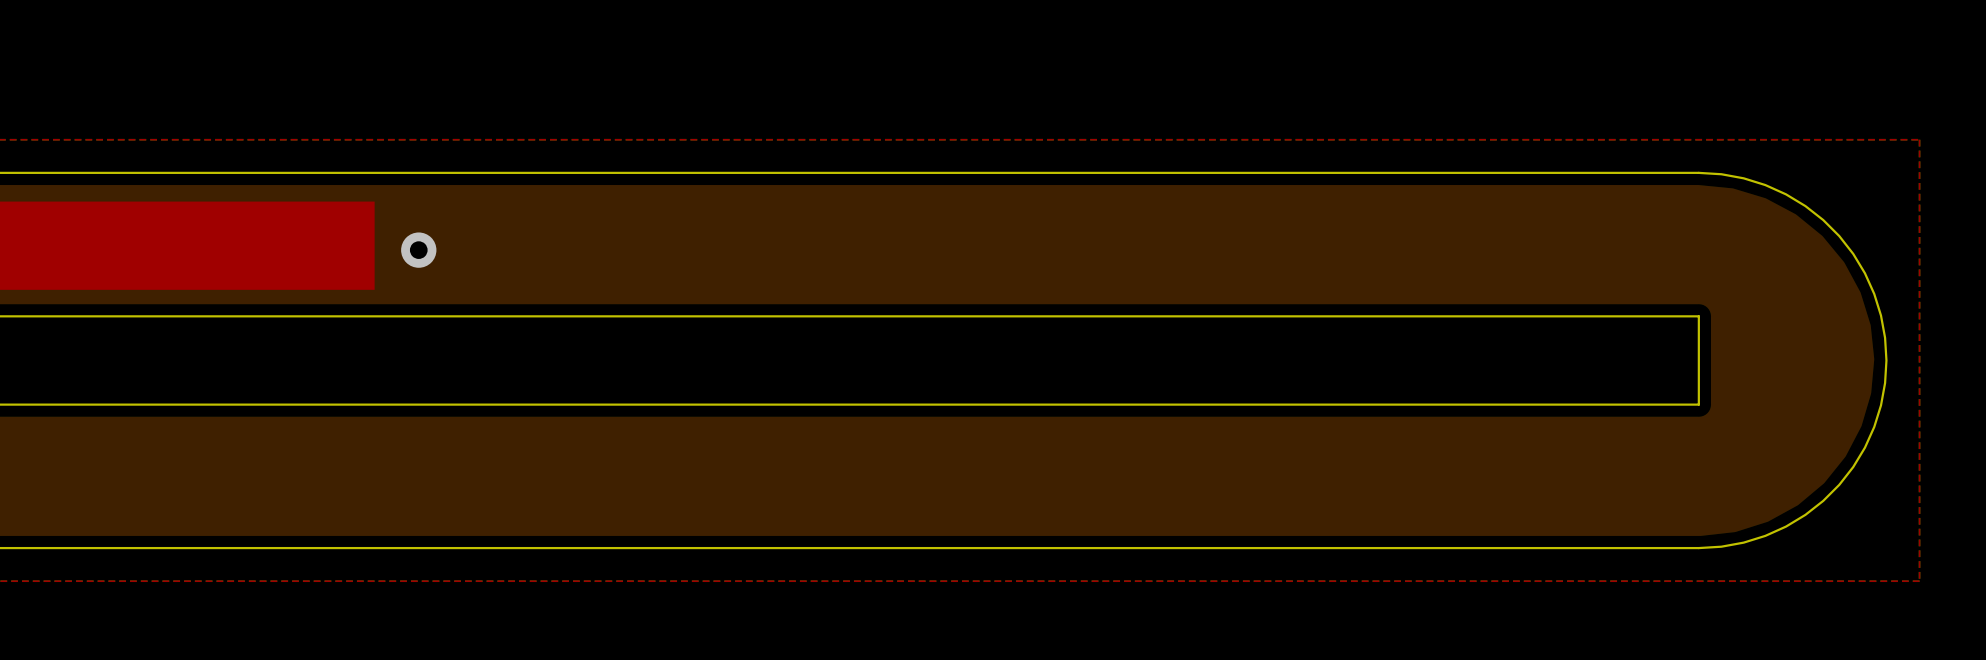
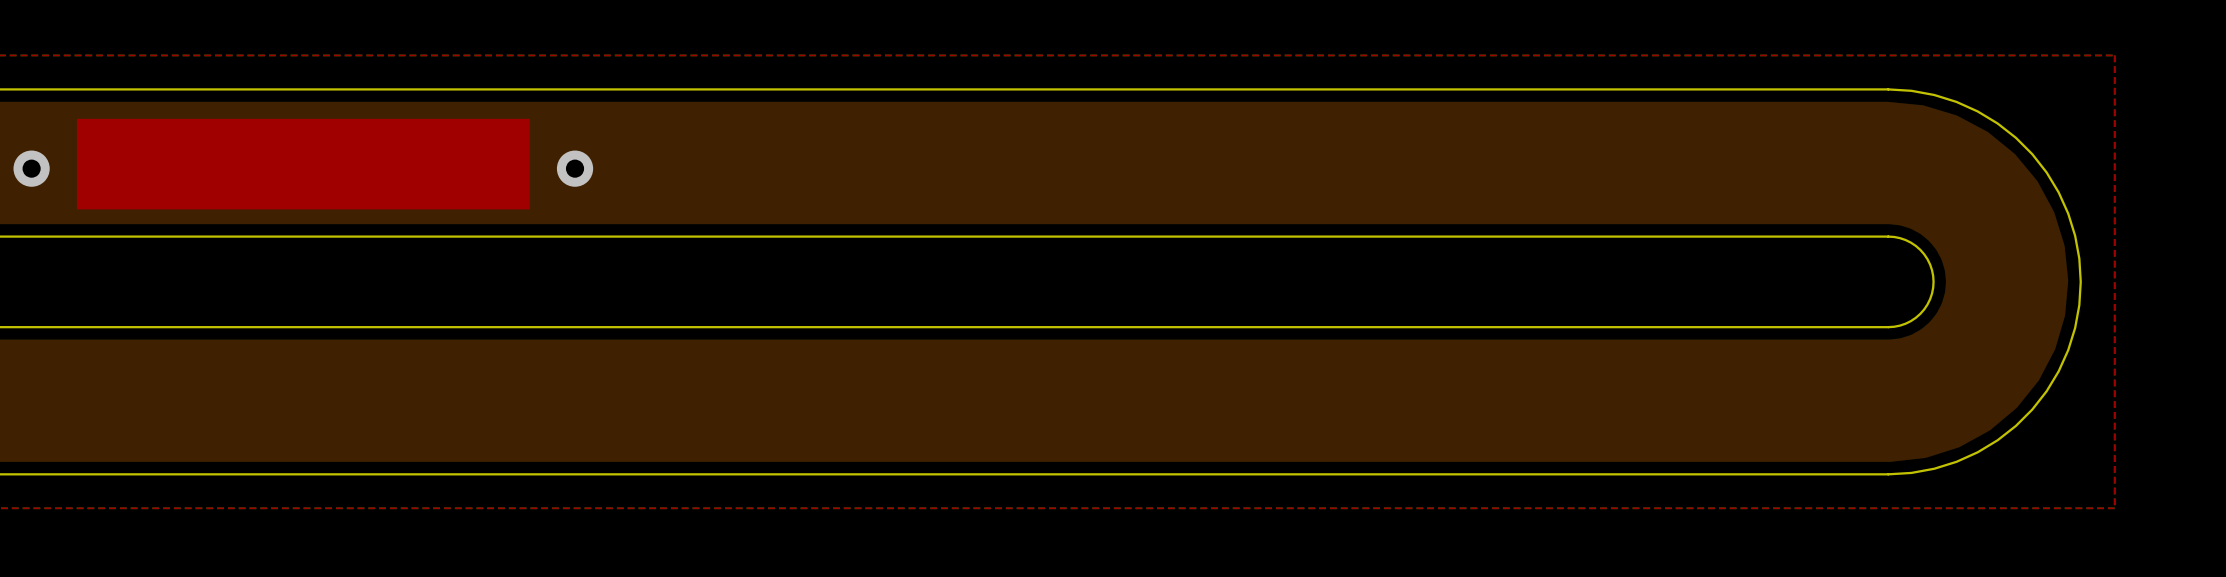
board edge: (1698, 316) (1698, 404) -> (1888, 236) (1905, 240) (1920, 249) (1930, 264) (1933, 281) (1930, 299) (1920, 313) (1905, 323) (1888, 327)

